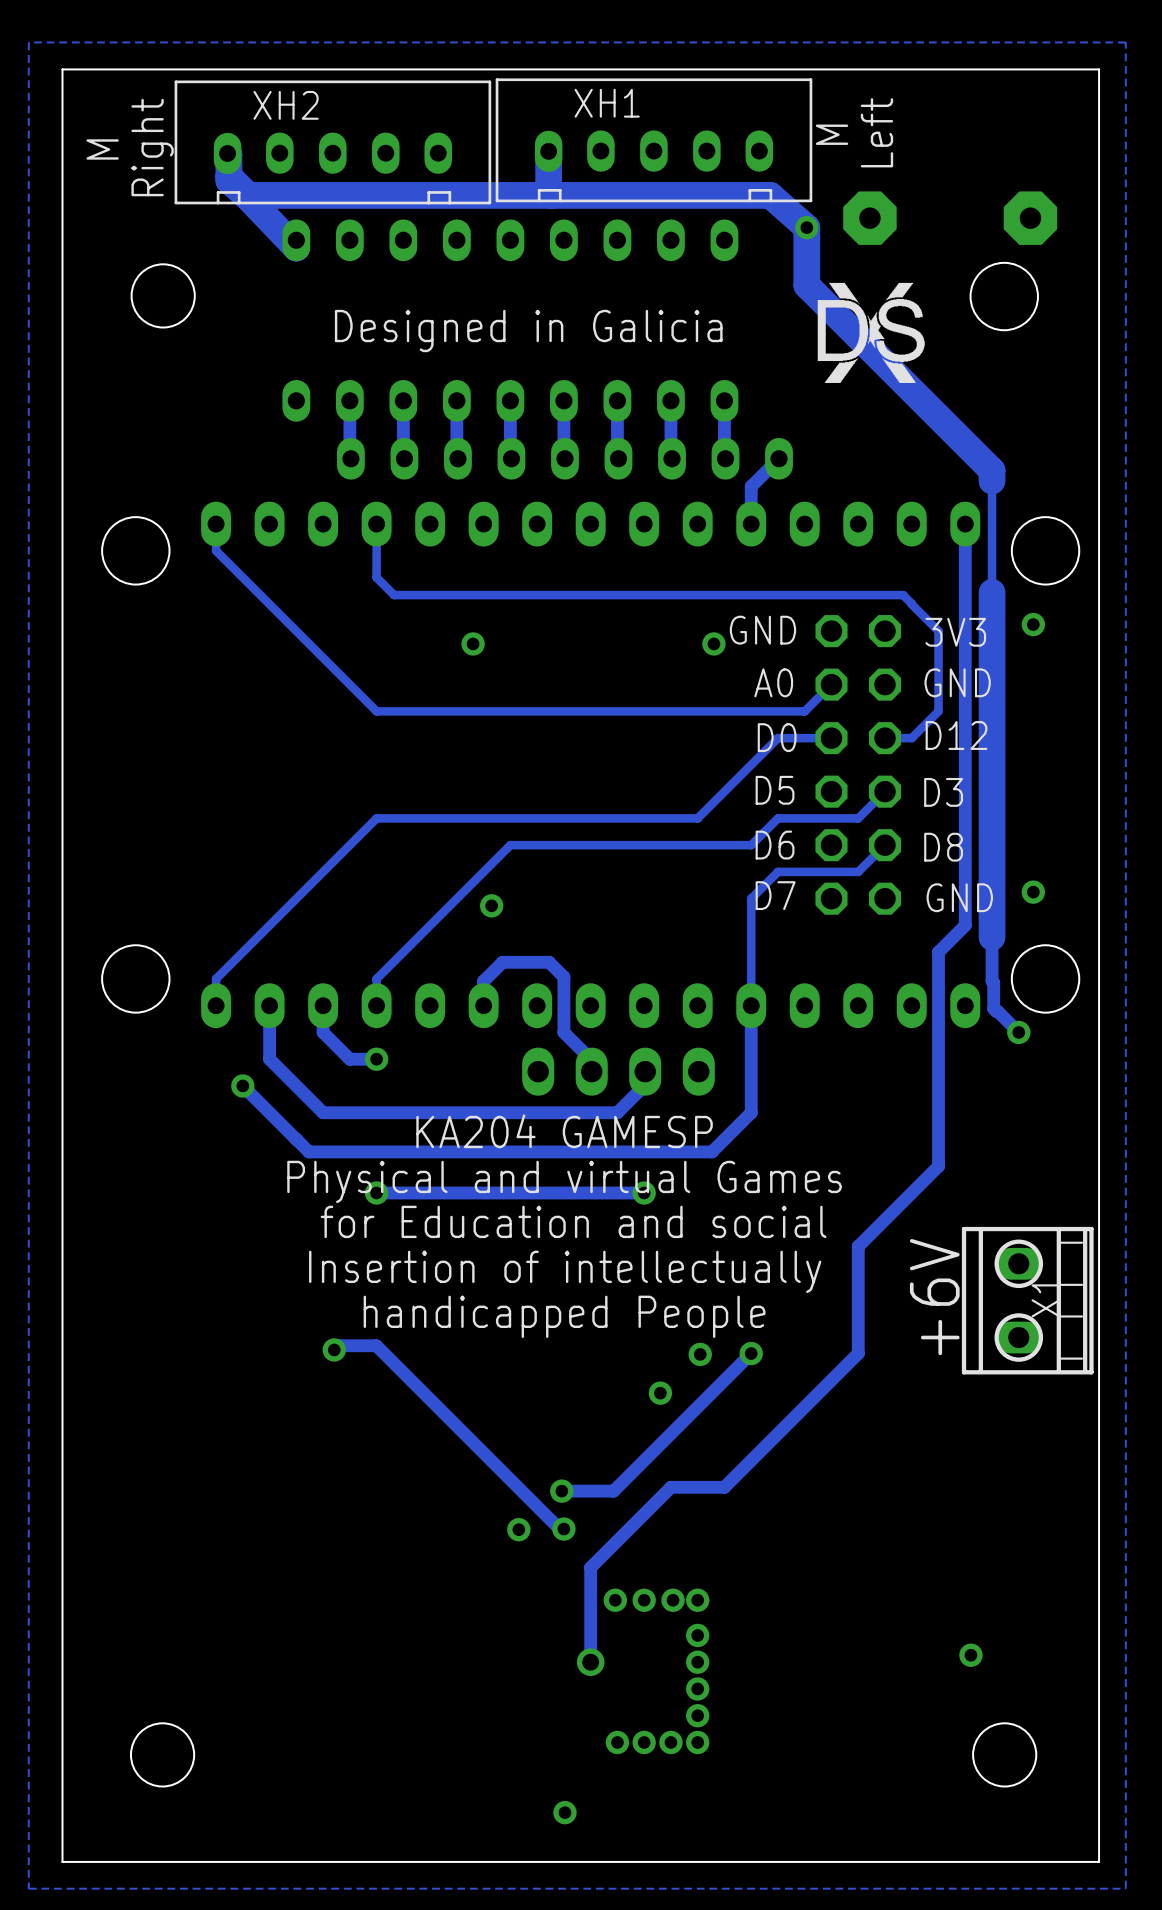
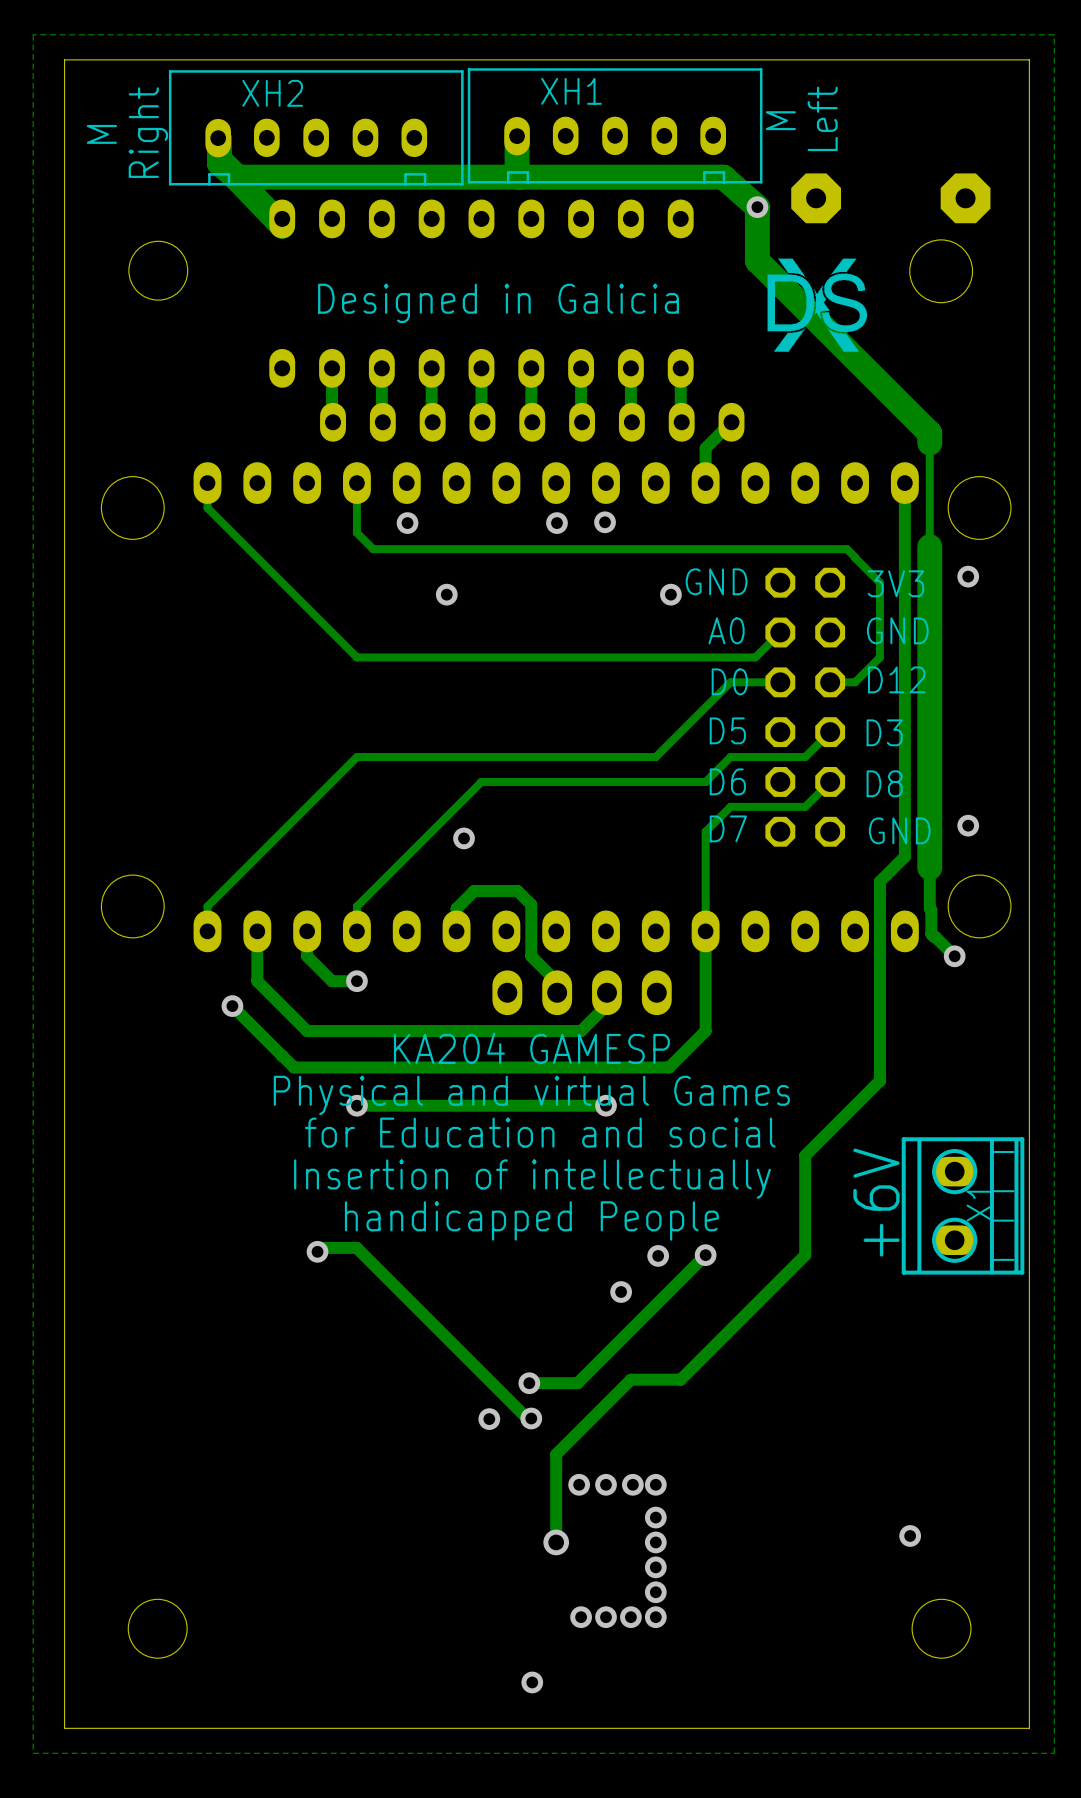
via: none -> (605, 522)
via: none -> (407, 523)
via: none -> (556, 523)

